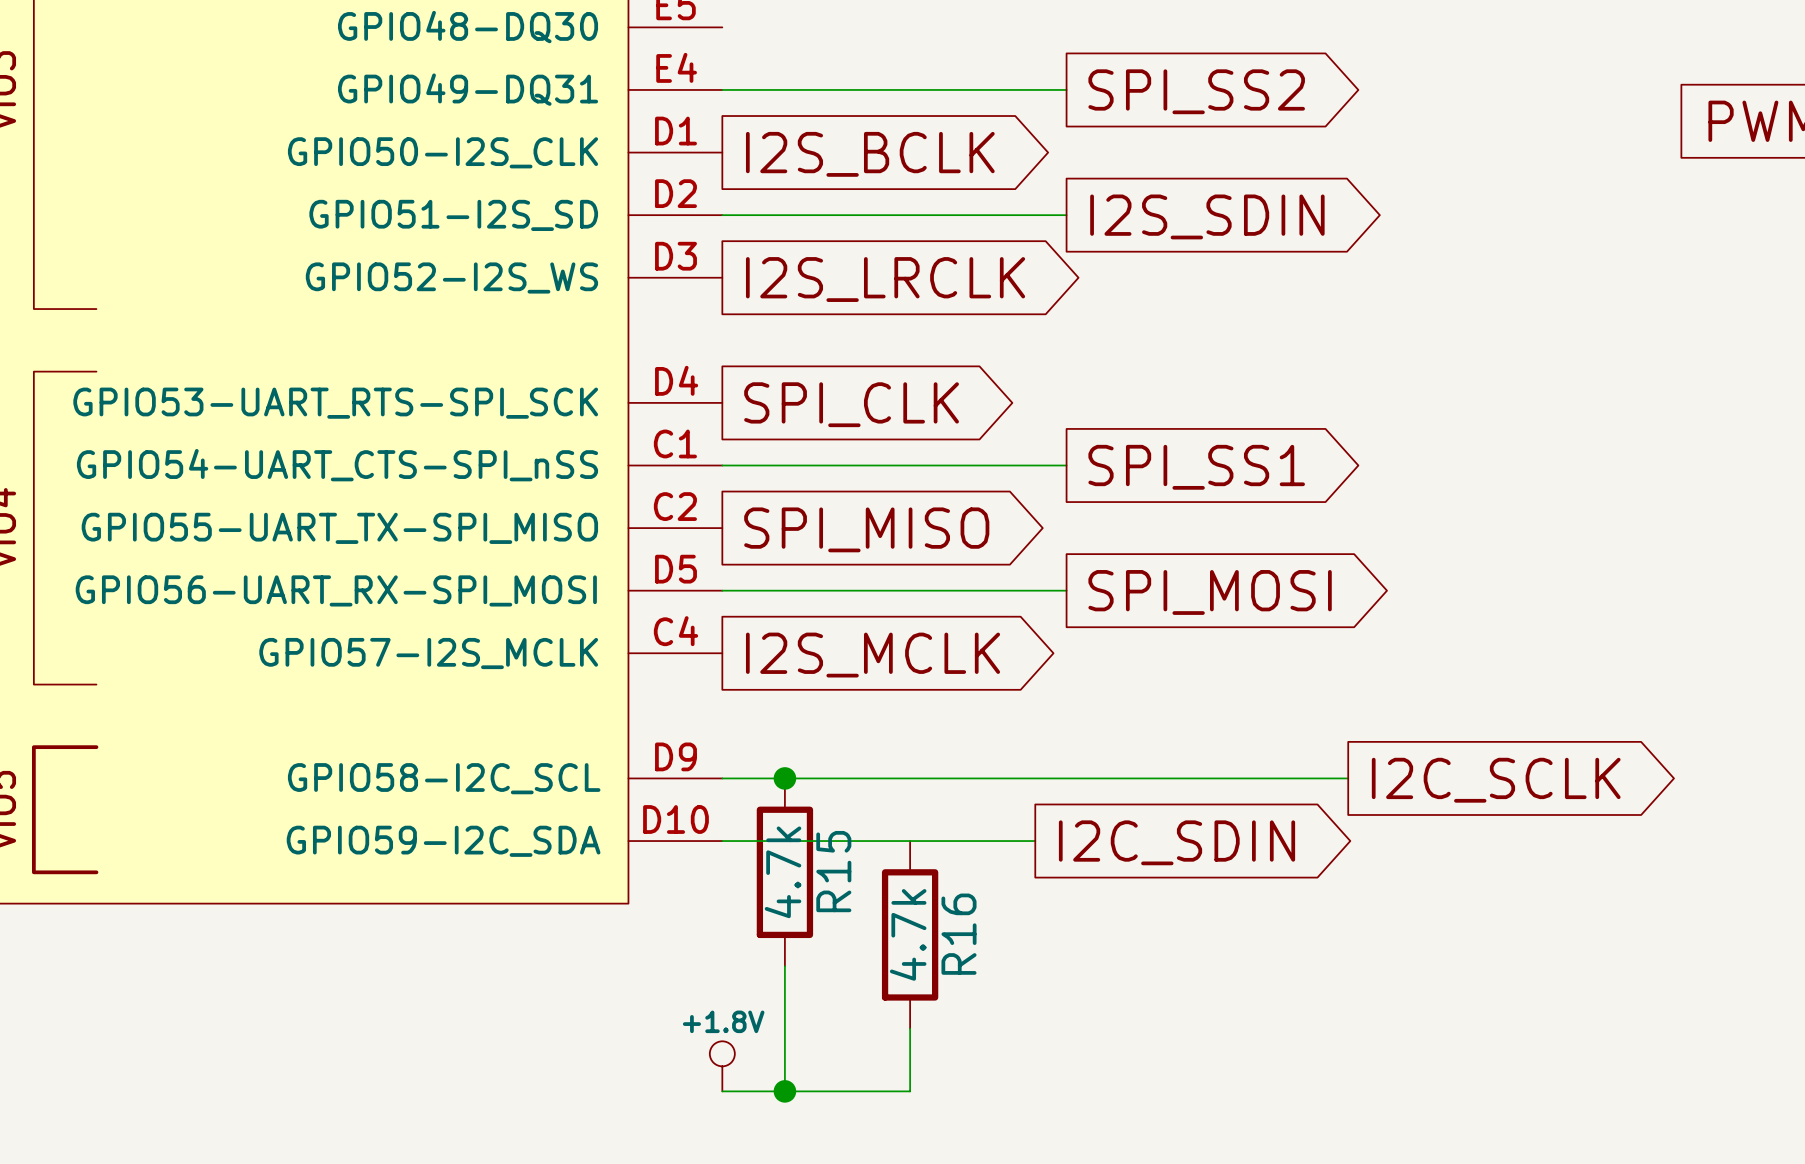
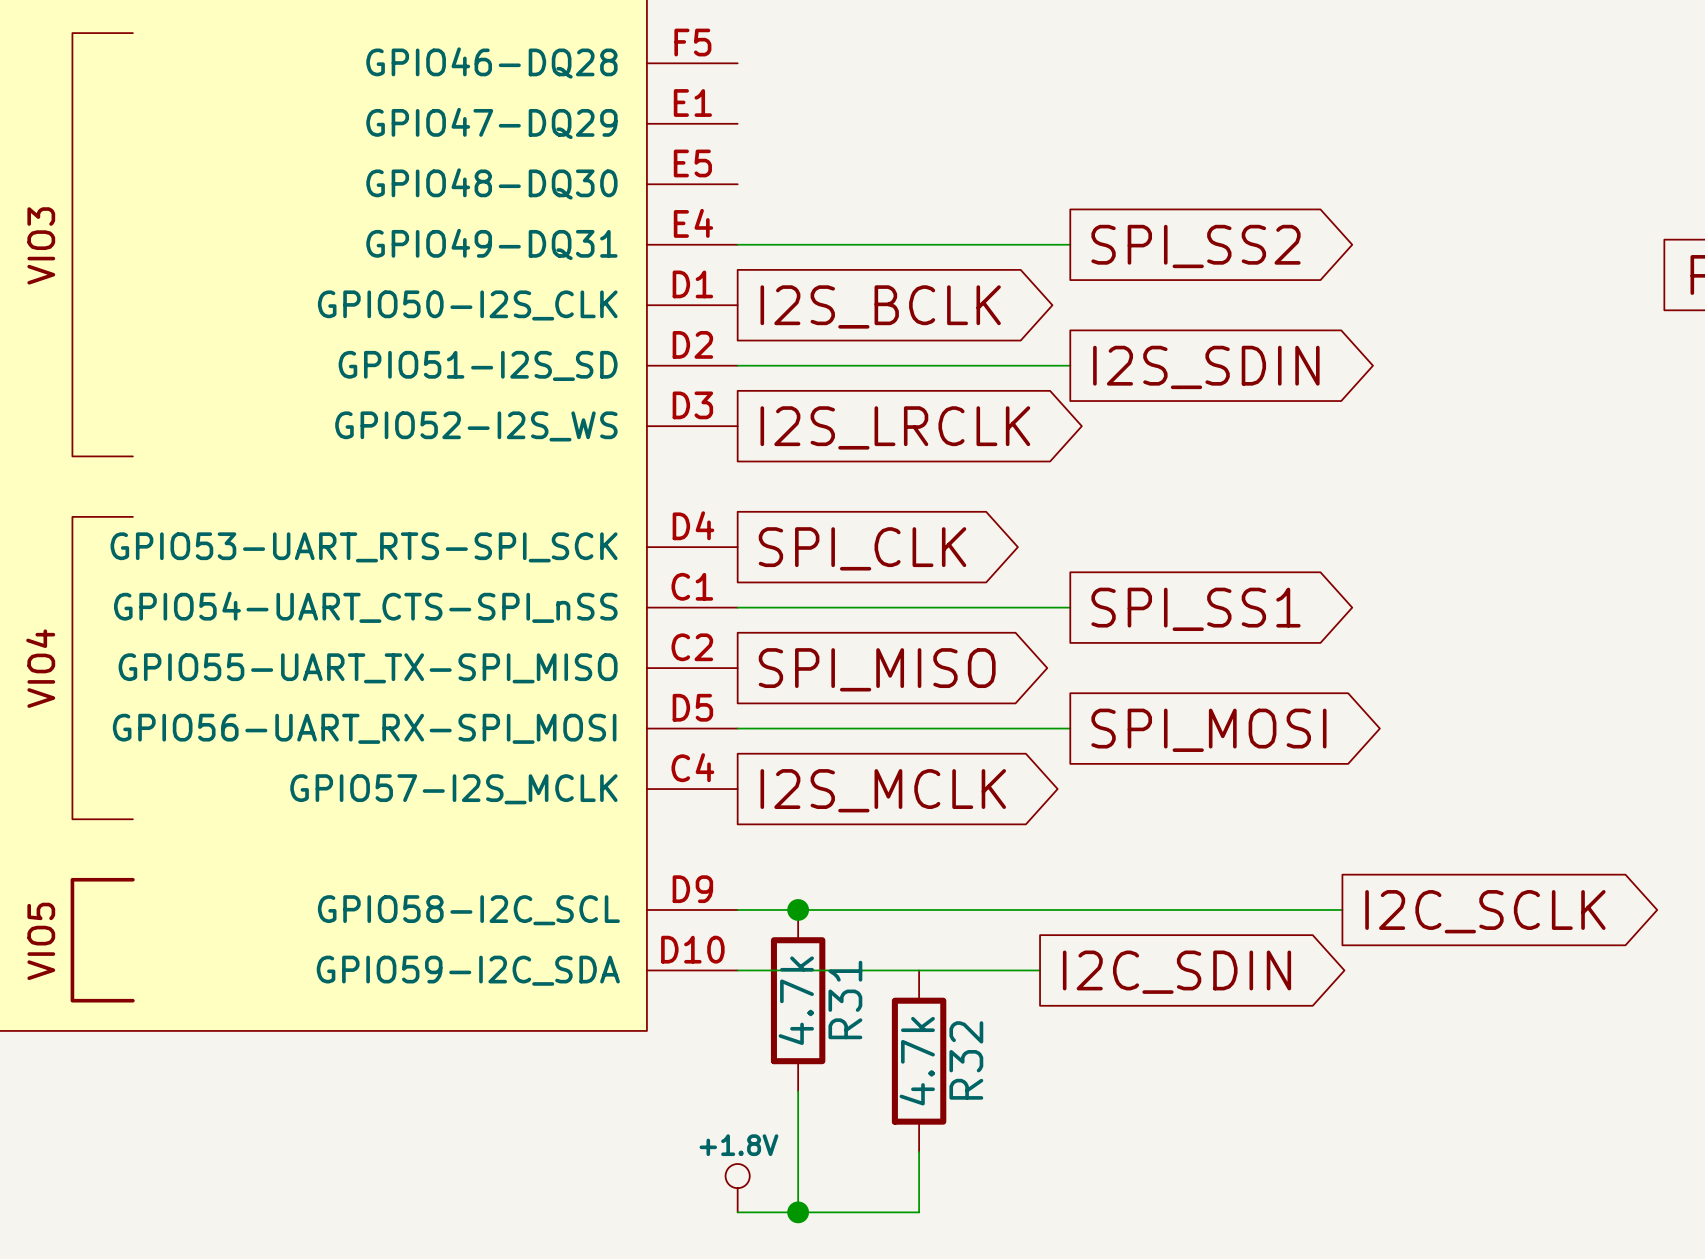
R15 name: R15 (833, 871) -> R31 (845, 999)
R16 name: R16 (959, 934) -> R32 (966, 1060)

